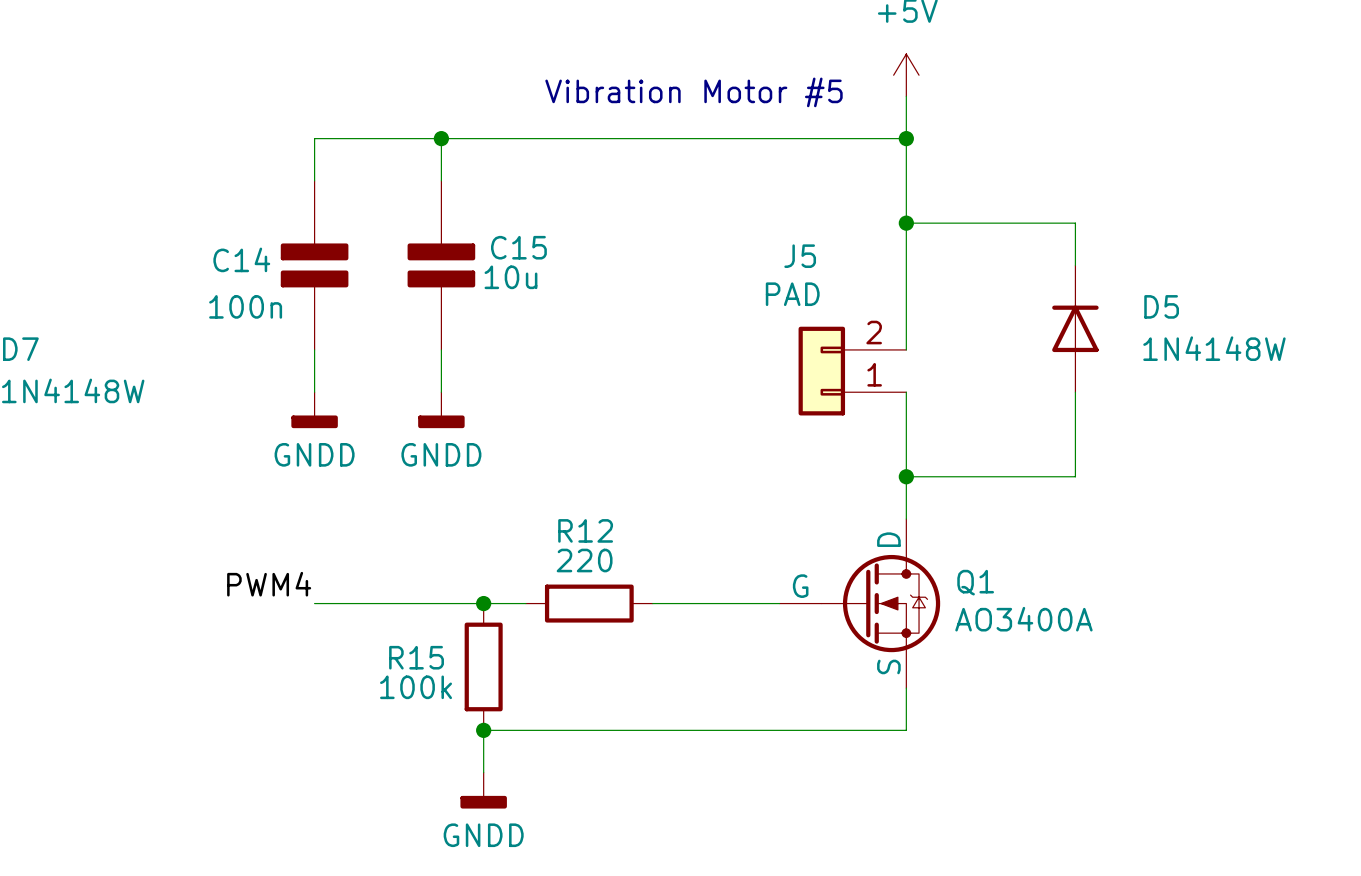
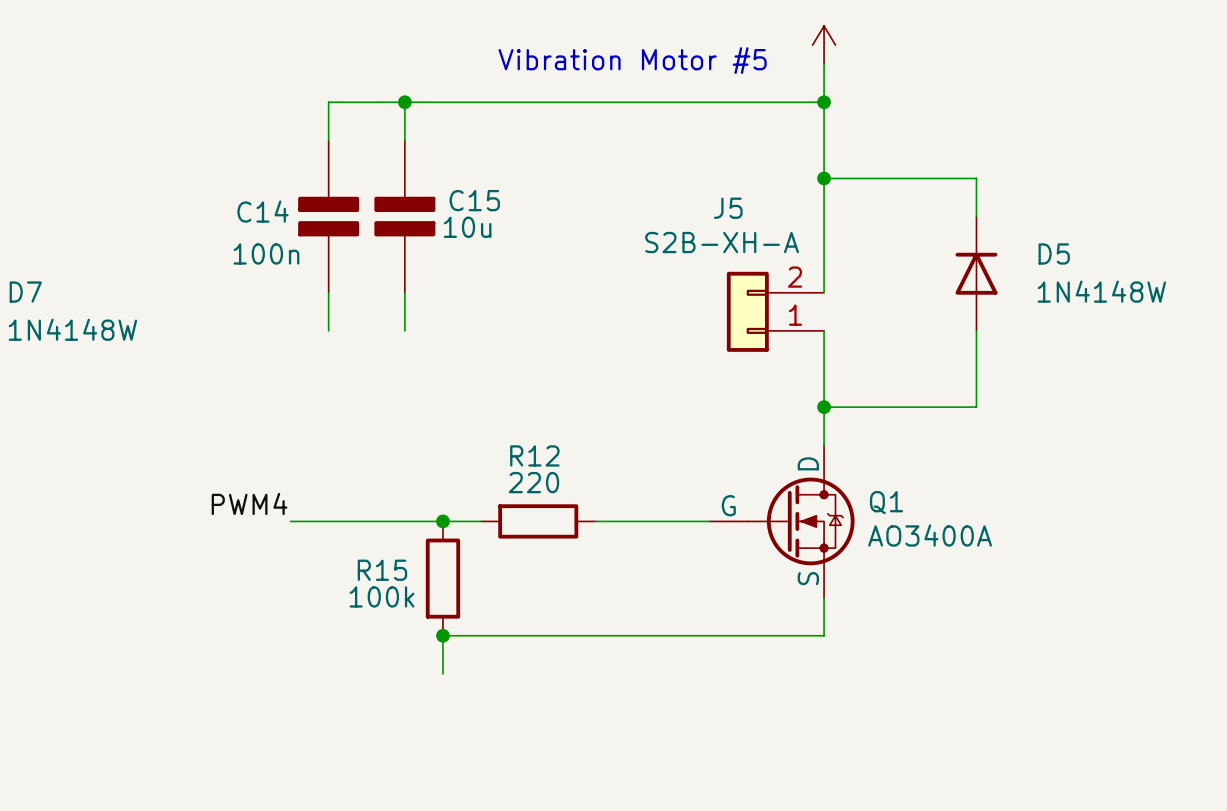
wire: (356, 138) (314, 138) (314, 180) -> (328, 102) (328, 140)
C14 position: (314, 265) -> (328, 216)
J5 value: PAD (792, 294) -> S2B-XH-A (722, 242)
wire: (314, 349) (314, 392) -> (328, 292) (328, 330)
power symbol: GNDD (314, 410) -> none
power symbol: GNDD (441, 410) -> none
power symbol: GNDD (483, 790) -> none

